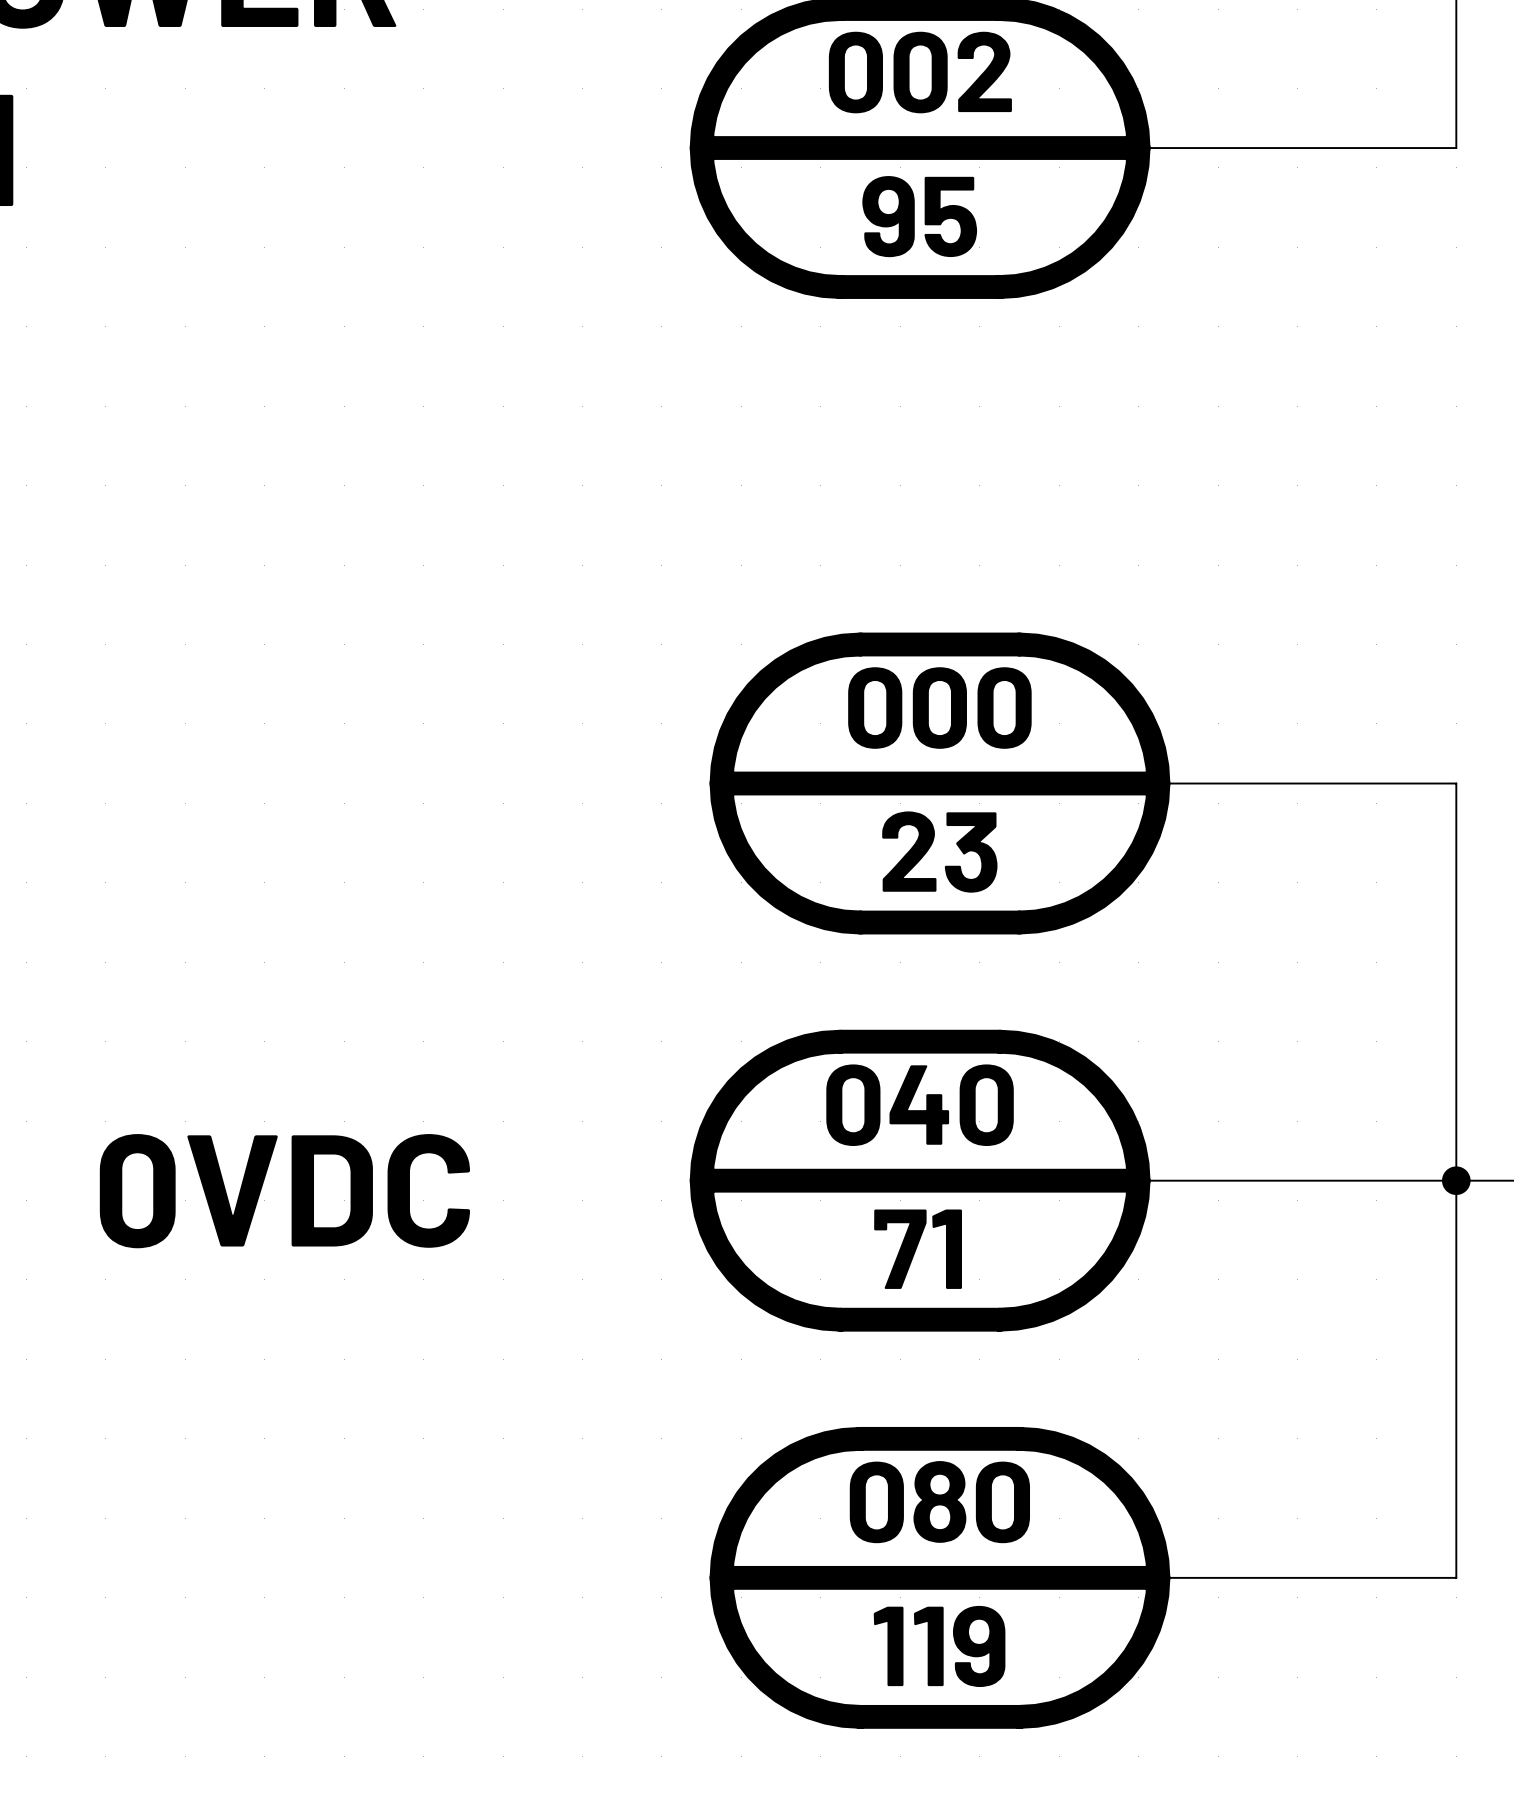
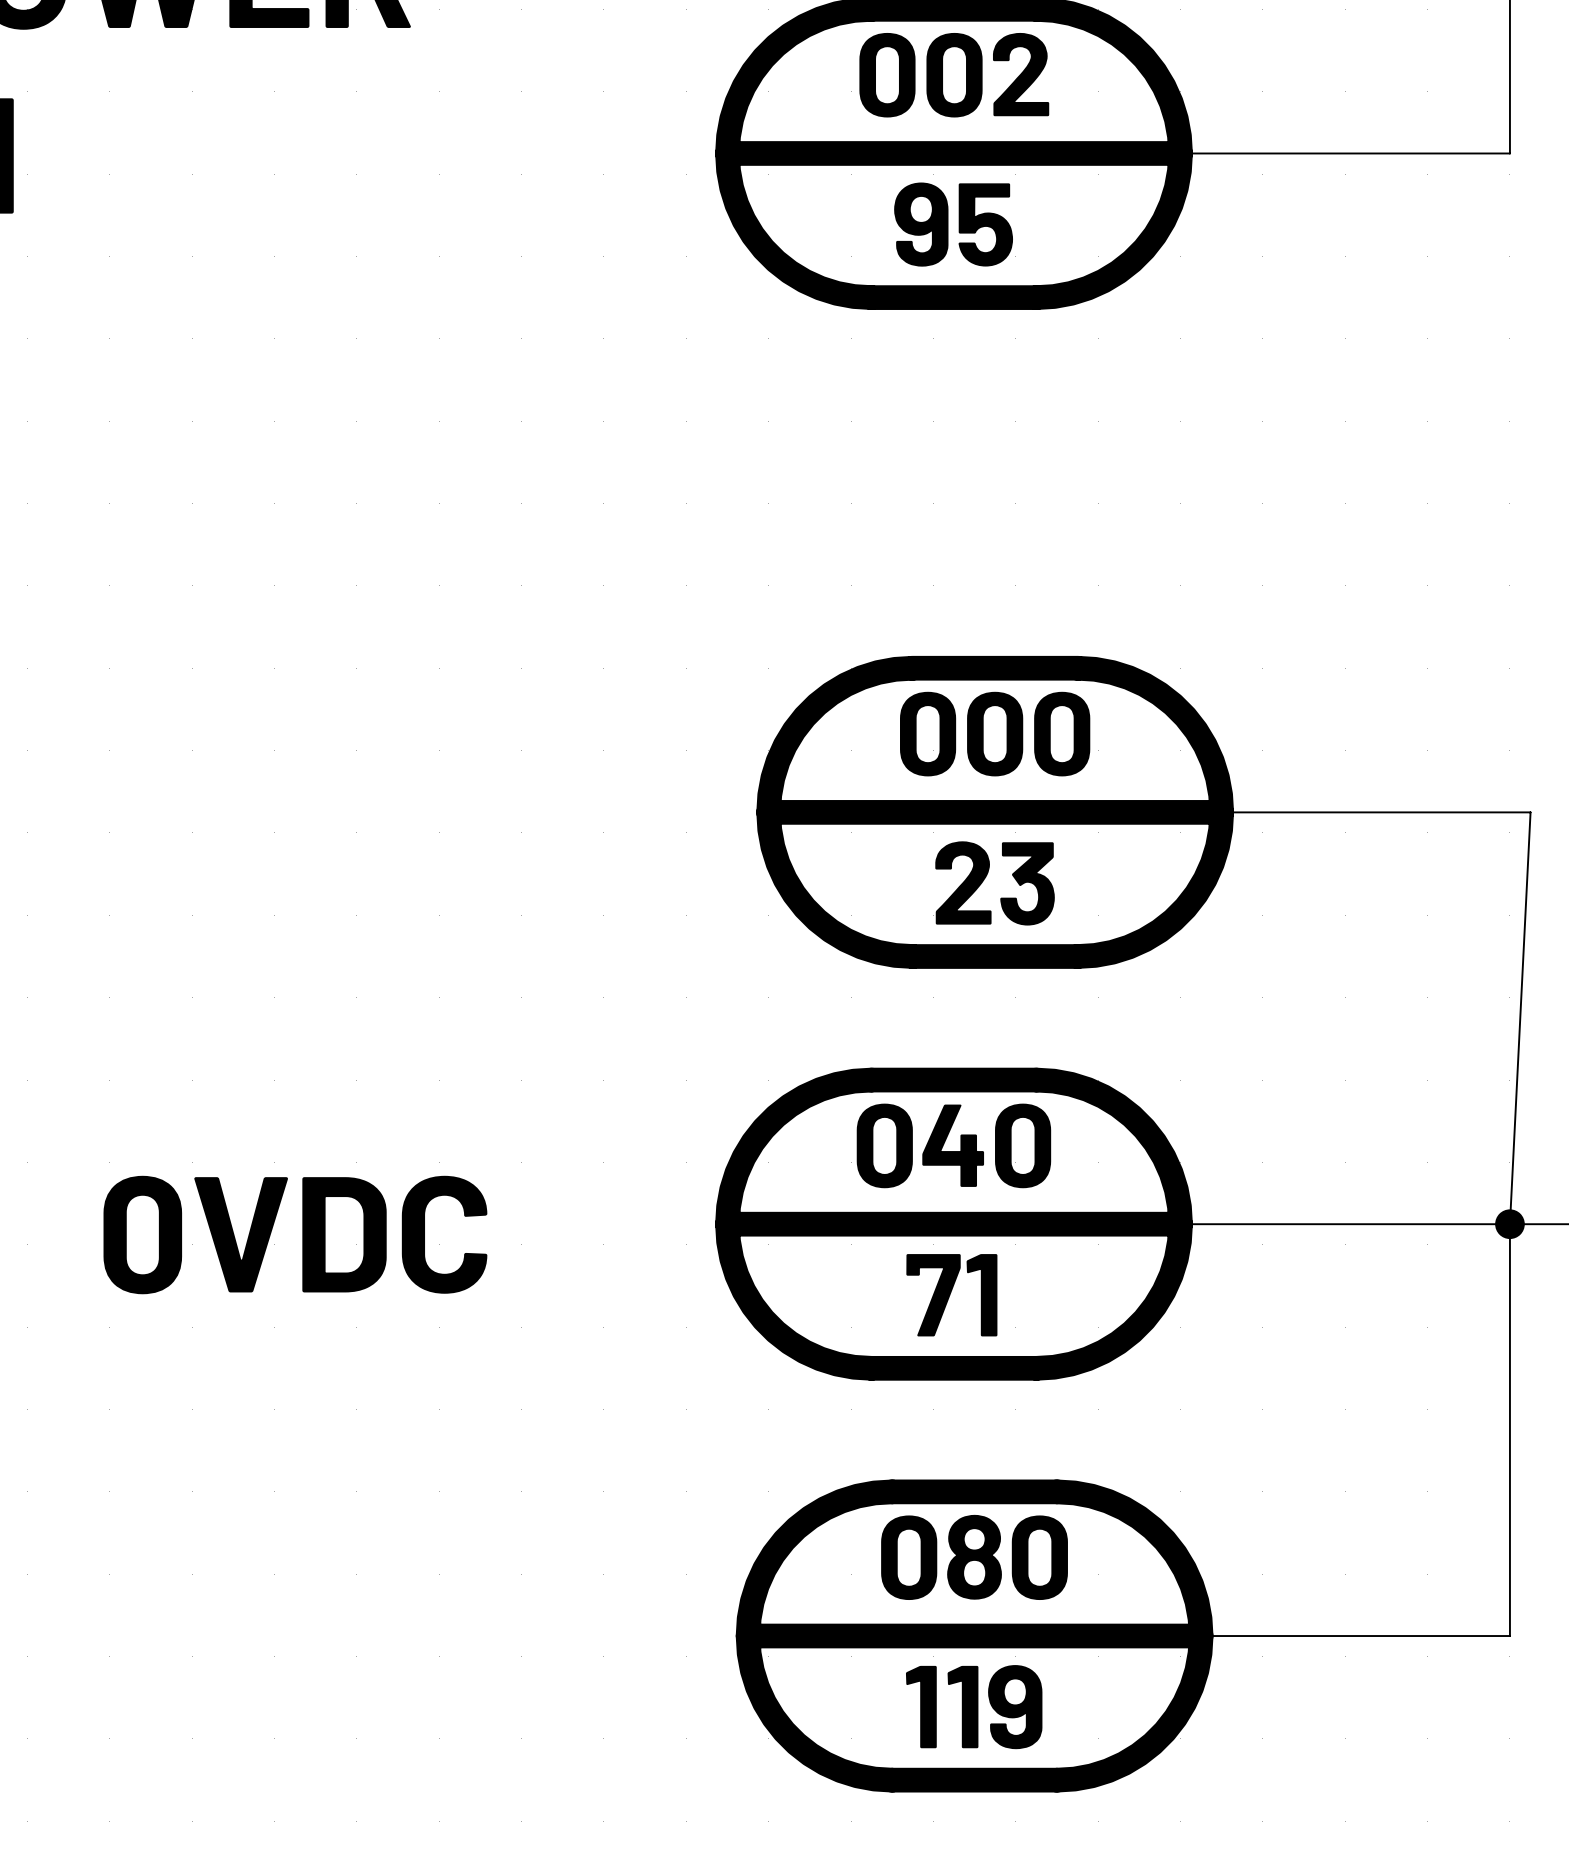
part position: (939, 783) -> (995, 812)
wire: (1456, 783) (1456, 1180) -> (1509, 812) (1530, 812) (1509, 1224)

